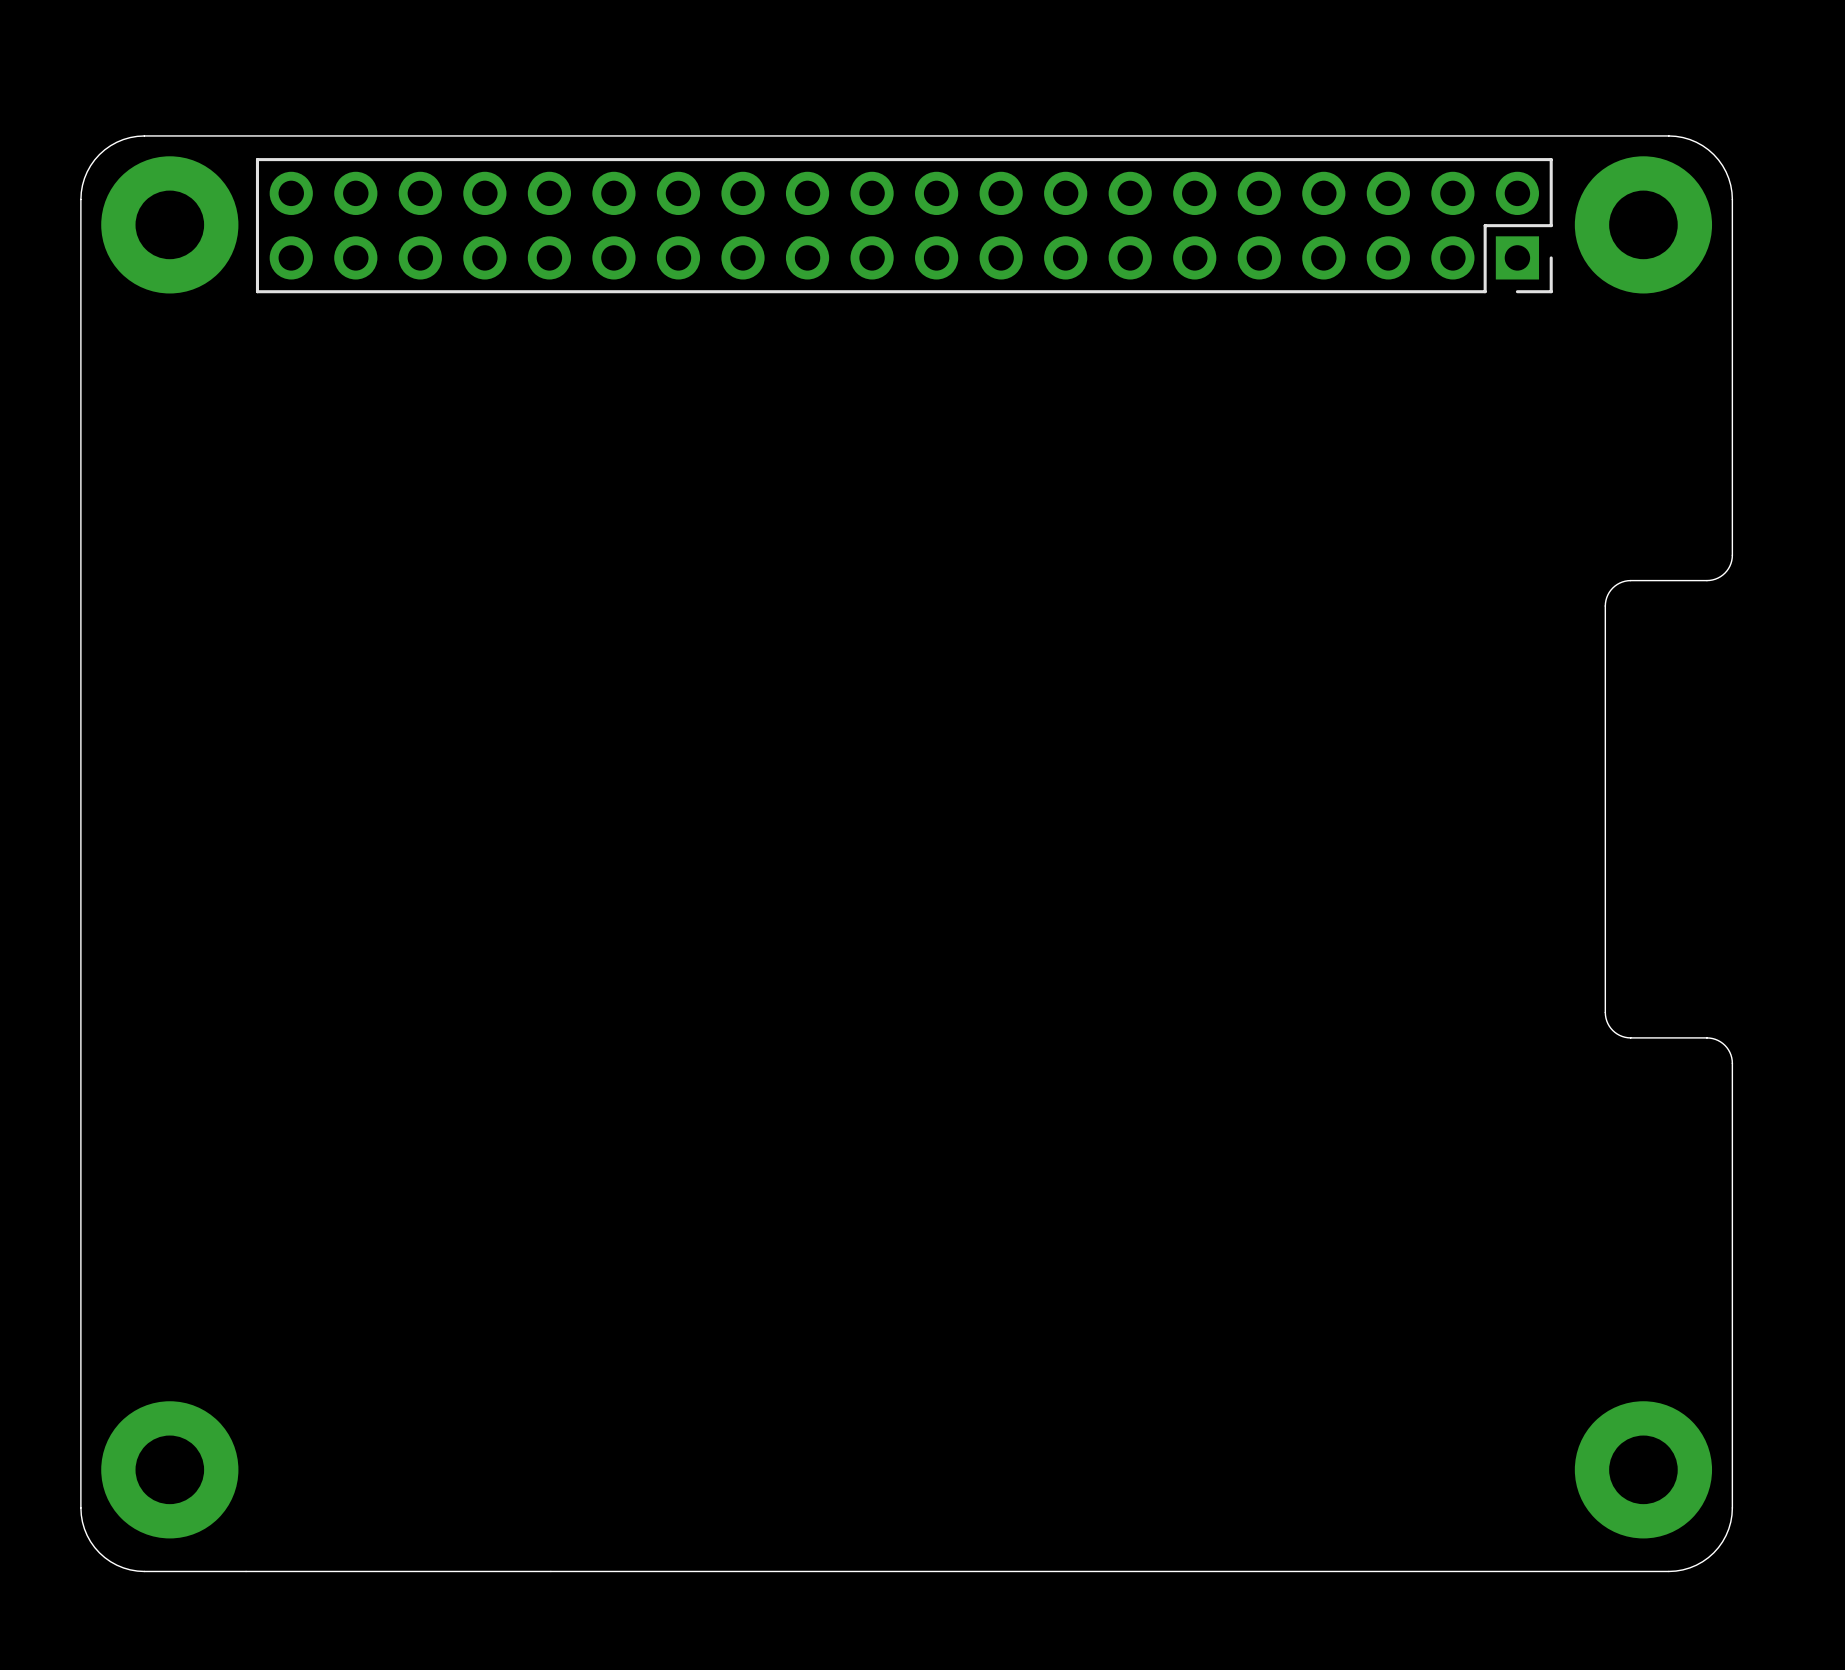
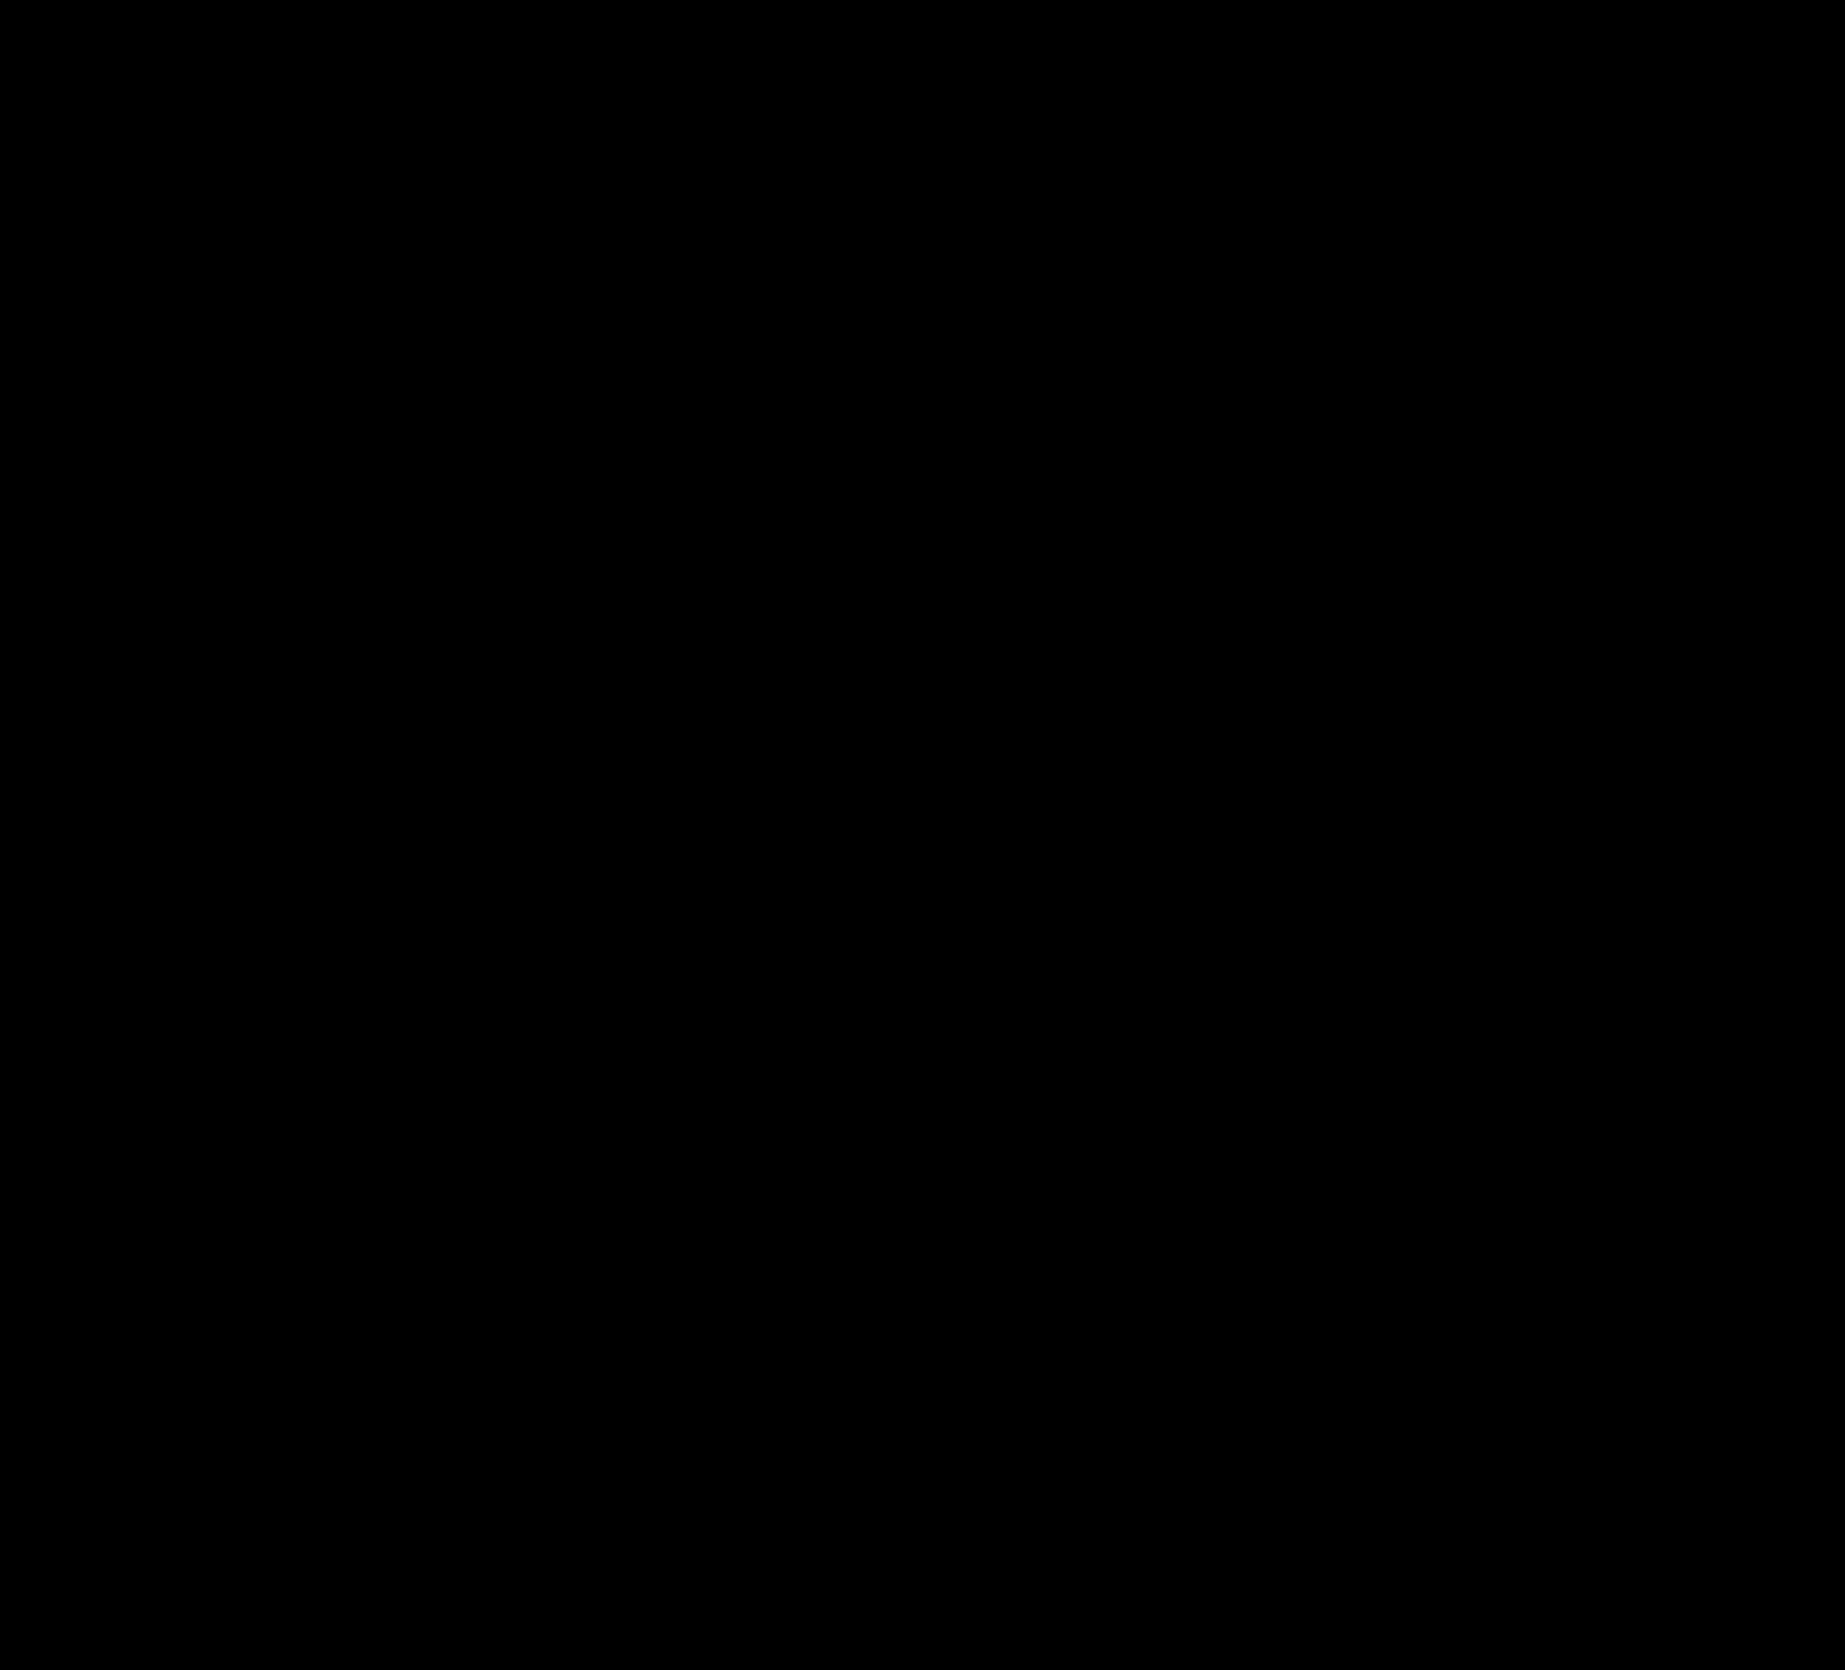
board edge: (1668, 135) (144, 135) (123, 139) (110, 145) (99, 154) (90, 165) (84, 178) (80, 199) (80, 1507) (82, 1522) (87, 1535) (99, 1552) (110, 1561) (123, 1567) (144, 1571) (1668, 1571) (1689, 1567) (1702, 1561) (1713, 1552) (1722, 1541) (1728, 1528) (1732, 1507) (1731, 1057) (1724, 1045) (1712, 1038) (1622, 1036) (1610, 1028) (1605, 1012) (1605, 600) (1612, 588) (1625, 581) (1715, 579) (1726, 571) (1732, 558) (1731, 192) (1726, 171) (1713, 154) (1696, 142) (1682, 137) (1668, 135) -> none
part: (169, 224) -> none
part: (1643, 224) -> none
part: (904, 225) -> none
part: (169, 1469) -> none
part: (1643, 1469) -> none

